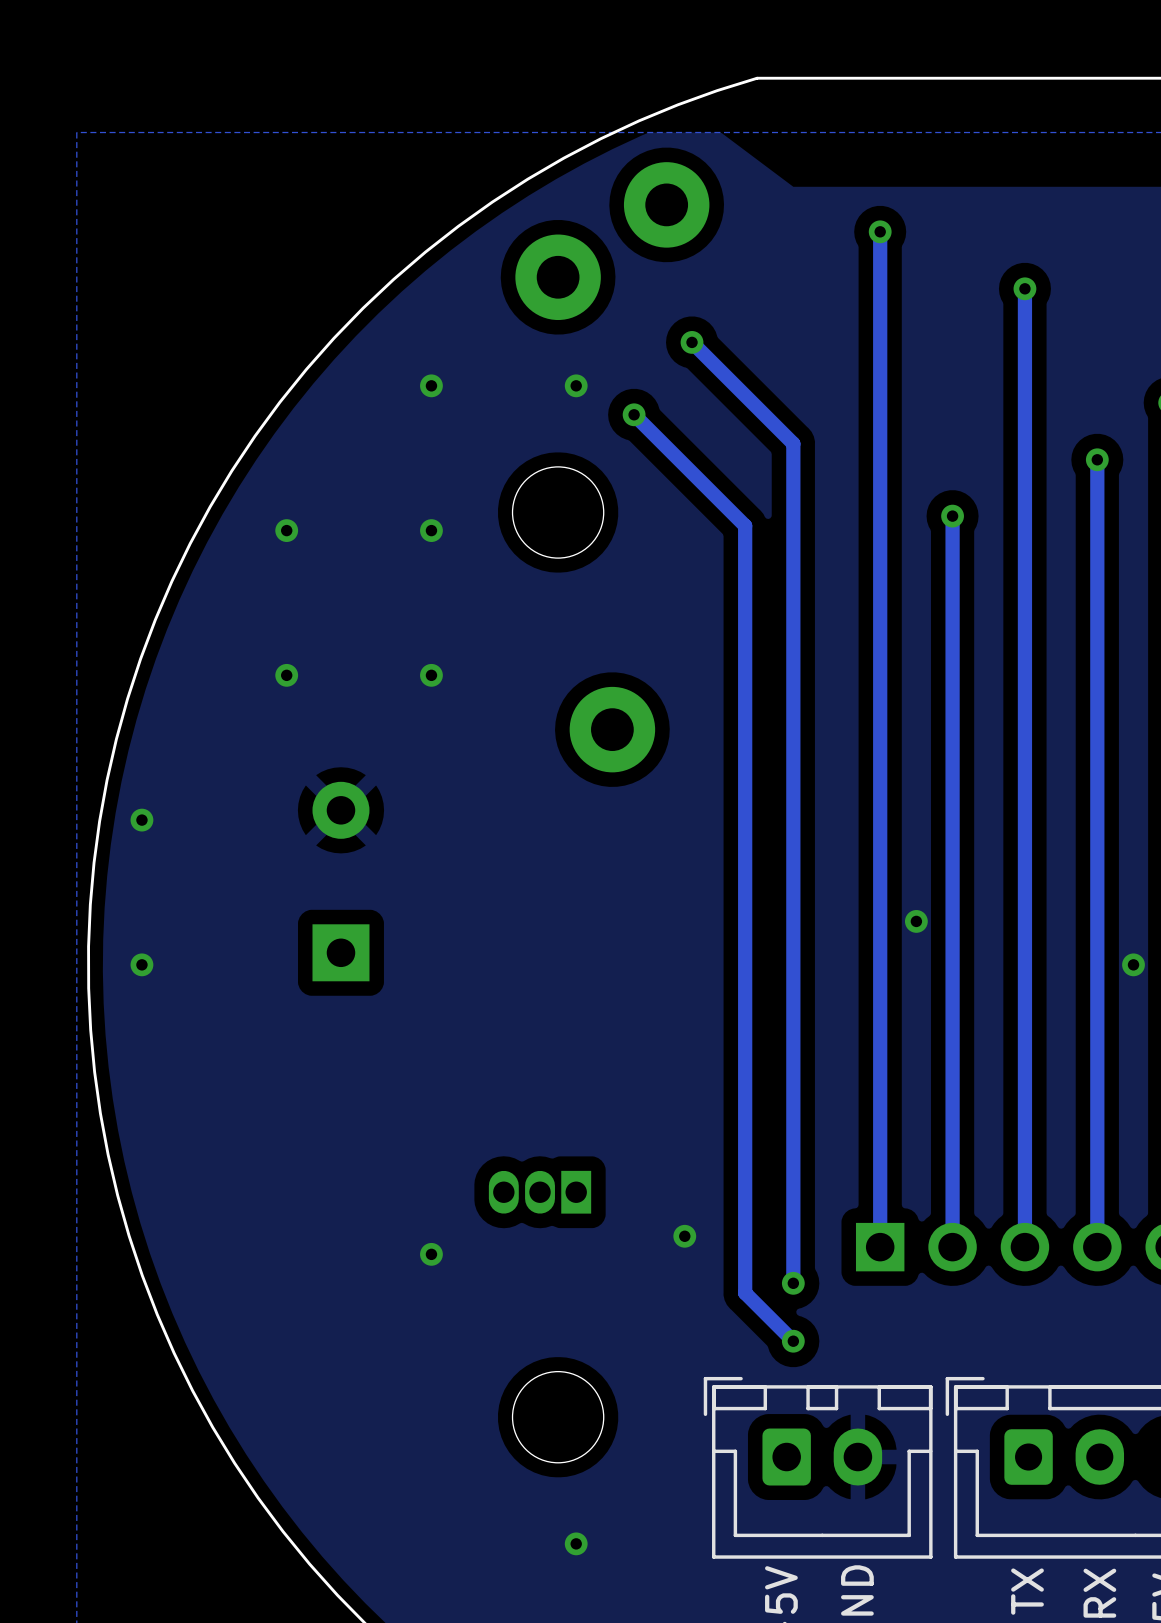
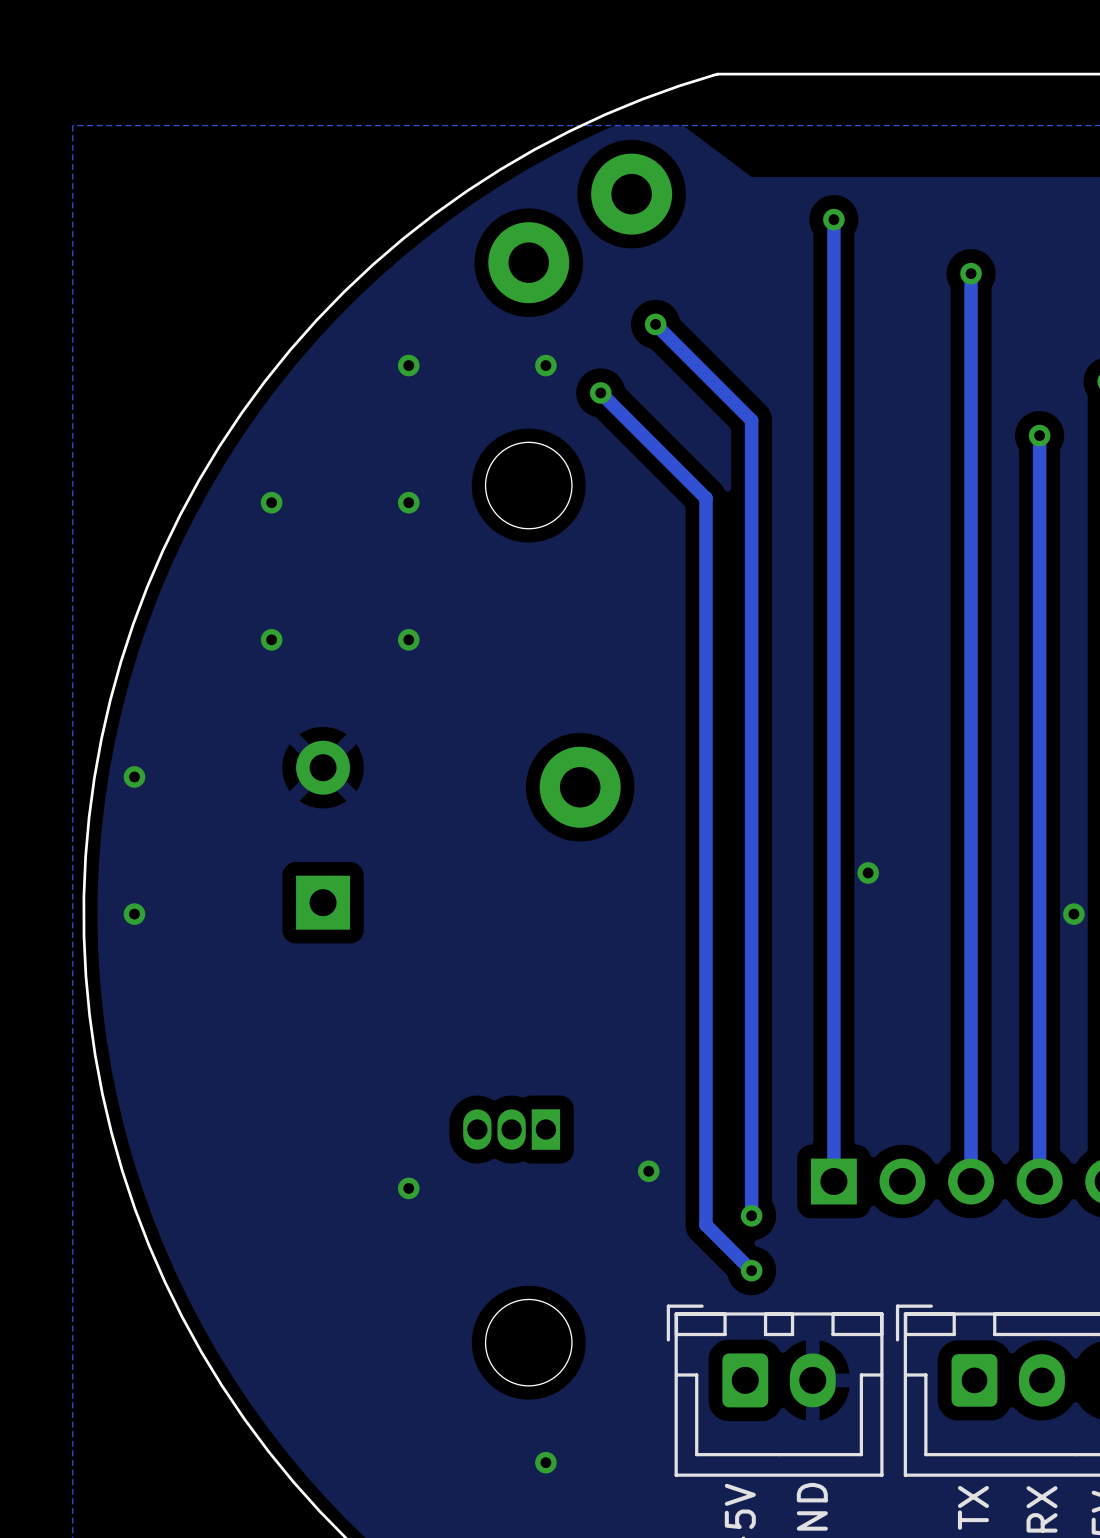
track: (952, 516) (952, 1239) -> none
via: (952, 516) -> none
part position: (612, 729) -> (580, 787)

